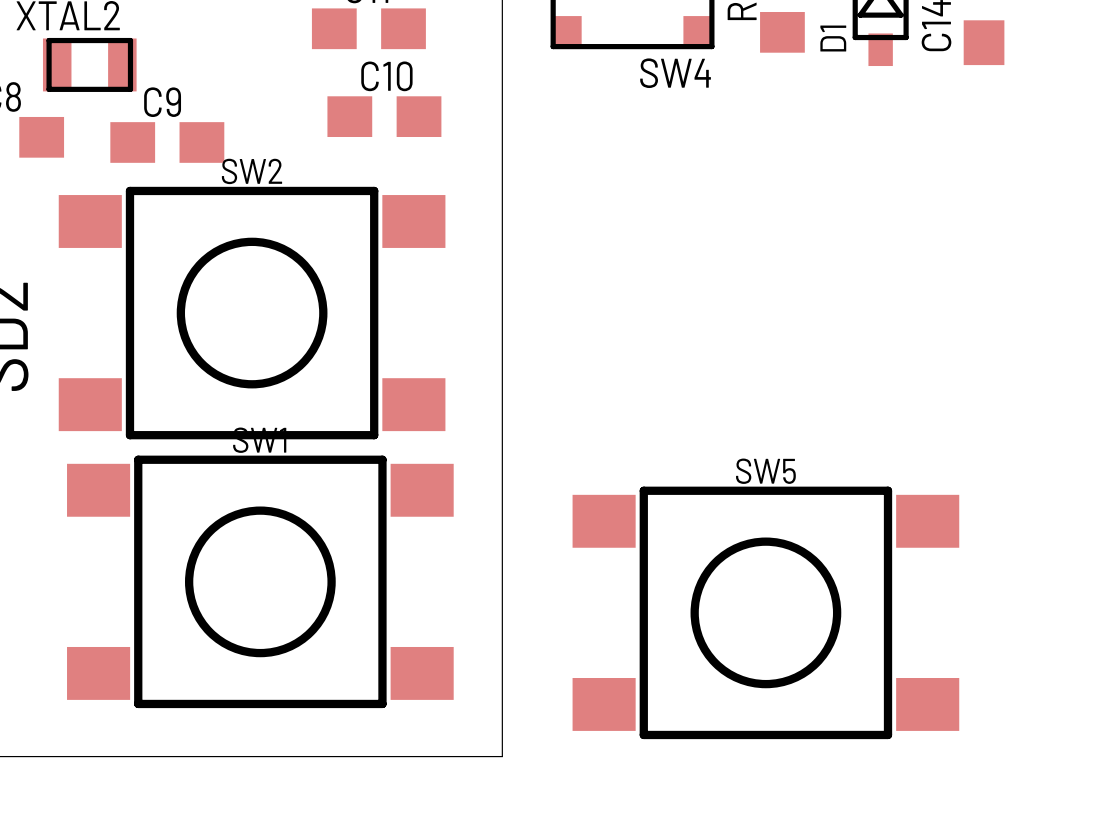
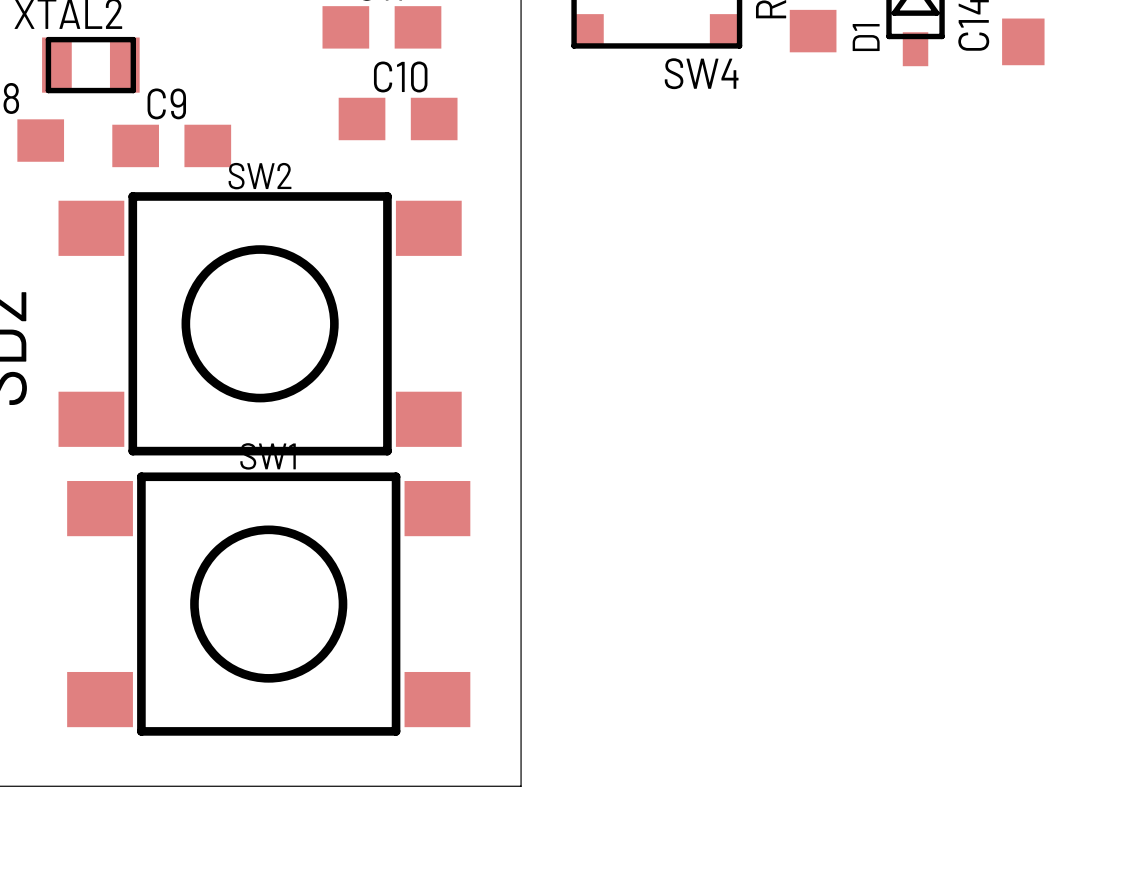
SW5: (765, 612) -> none

